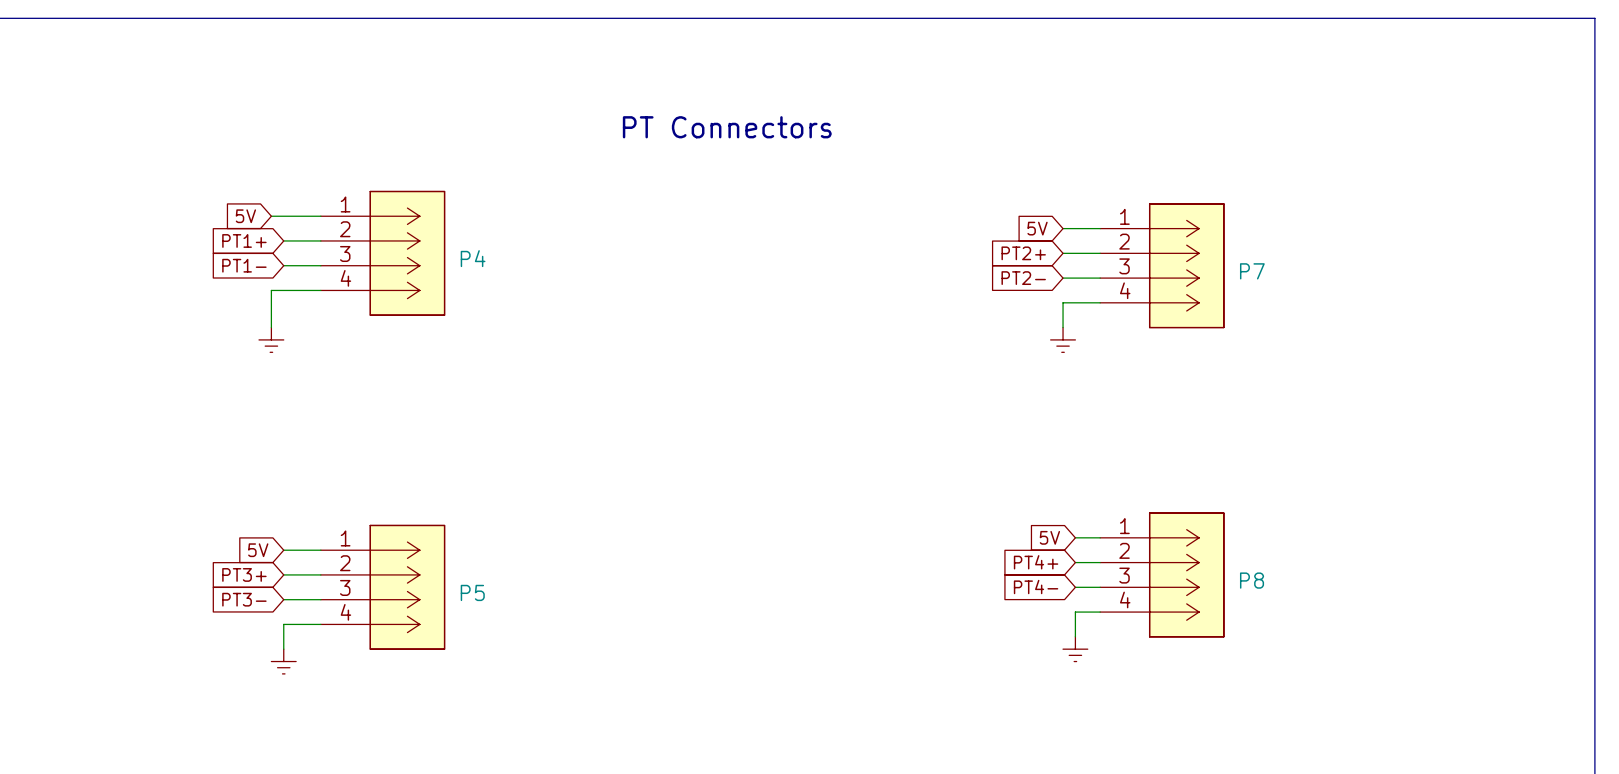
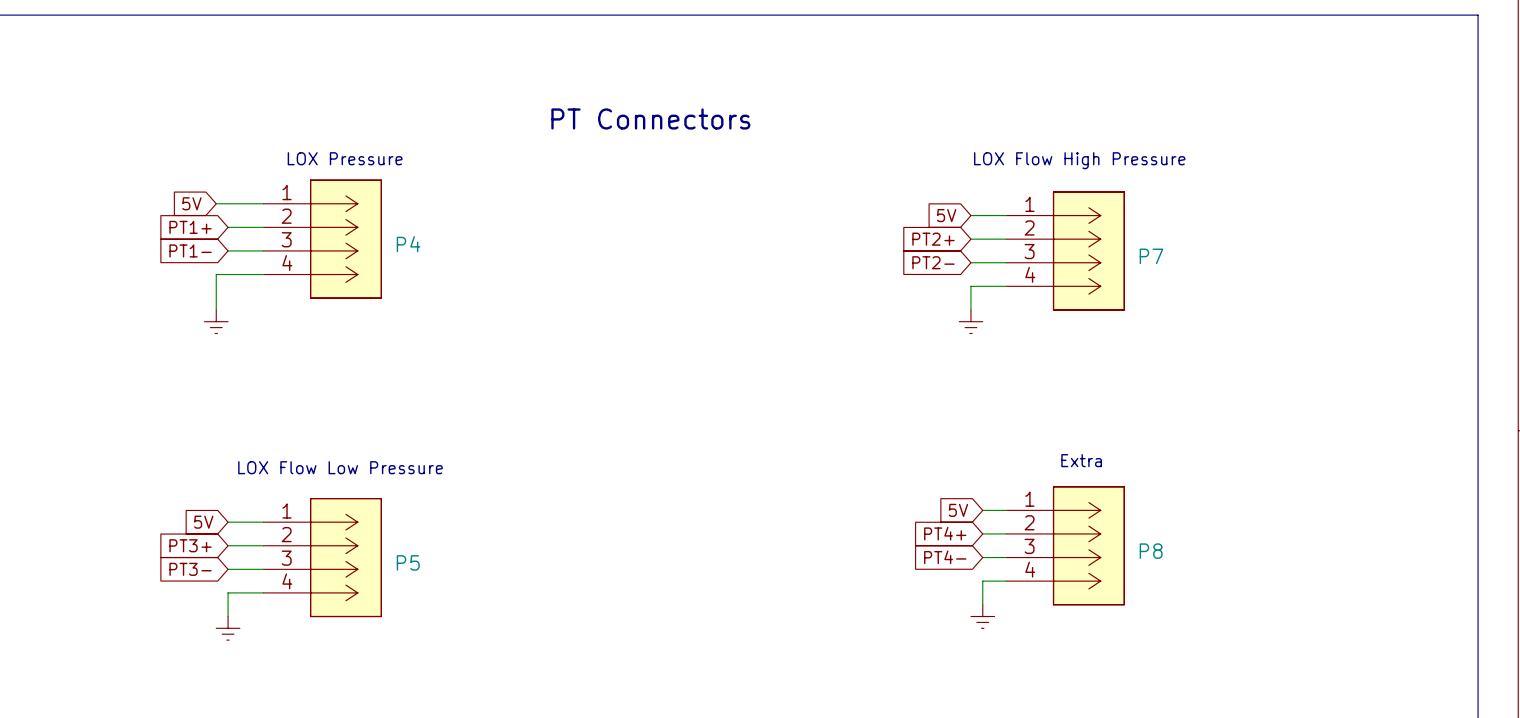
text: none -> LOX Pressure (345, 158)
text: none -> LOX Flow High Pressure (1079, 160)
text: none -> Extra (1081, 460)
text: none -> LOX Flow Low Pressure (340, 467)

